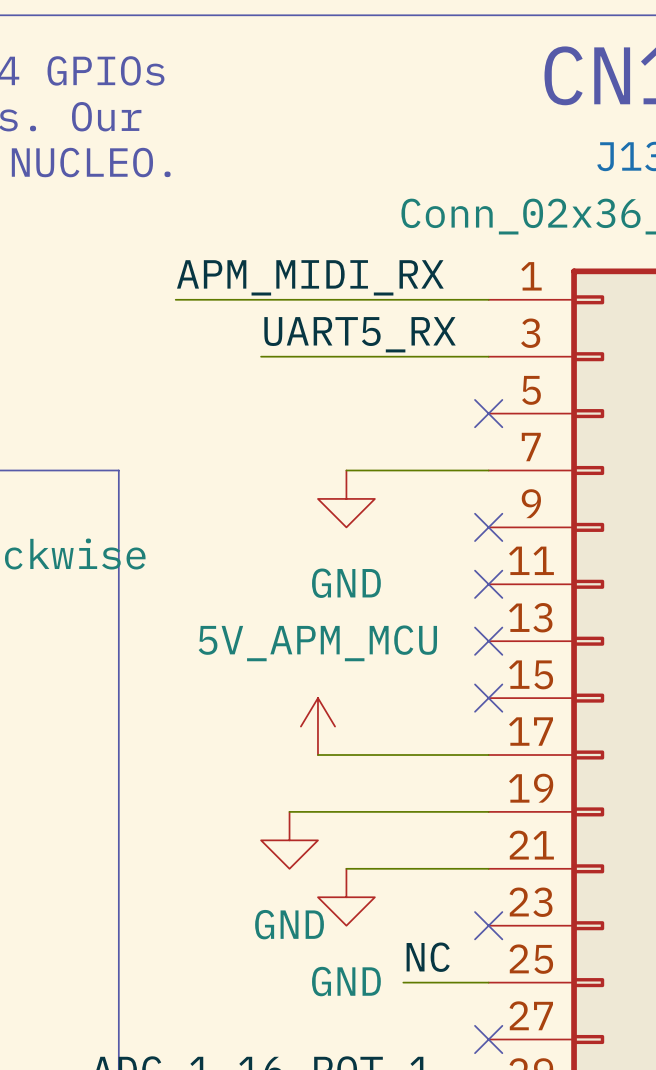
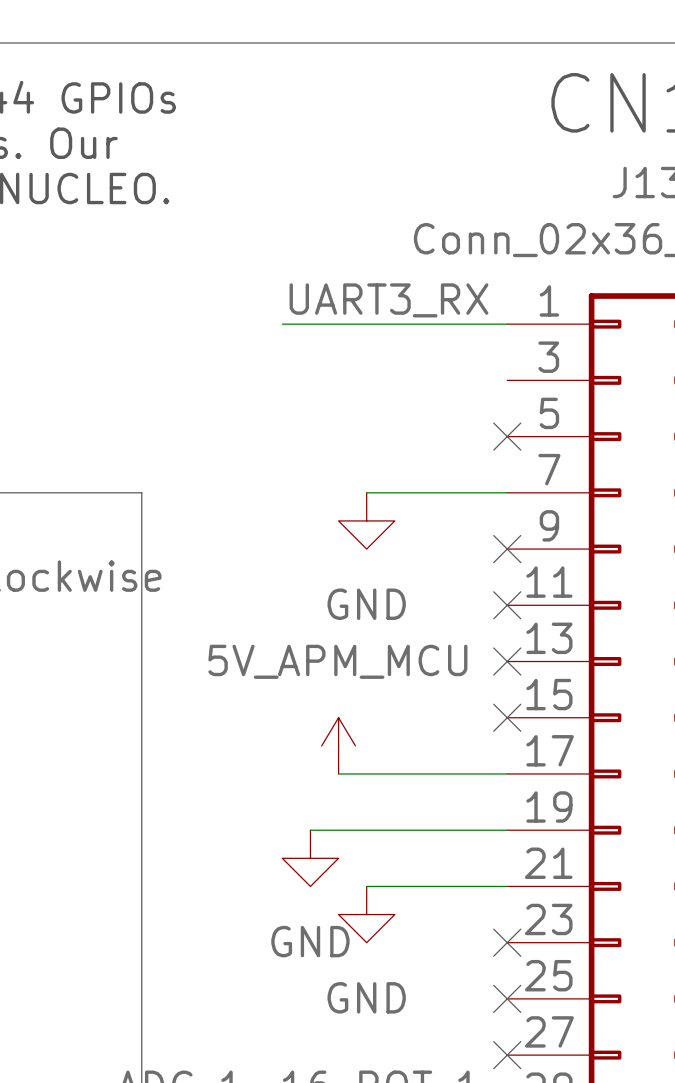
label: APM_MIDI_RX (310, 277) -> none
wire: (175, 299) (261, 299) -> none
label: UART5_RX (360, 334) -> UART3_RX (388, 300)
wire: (261, 356) (488, 356) -> none
label: NC (428, 957) -> none
wire: (403, 982) (488, 982) -> none
no-connect mark: none -> (507, 998)

